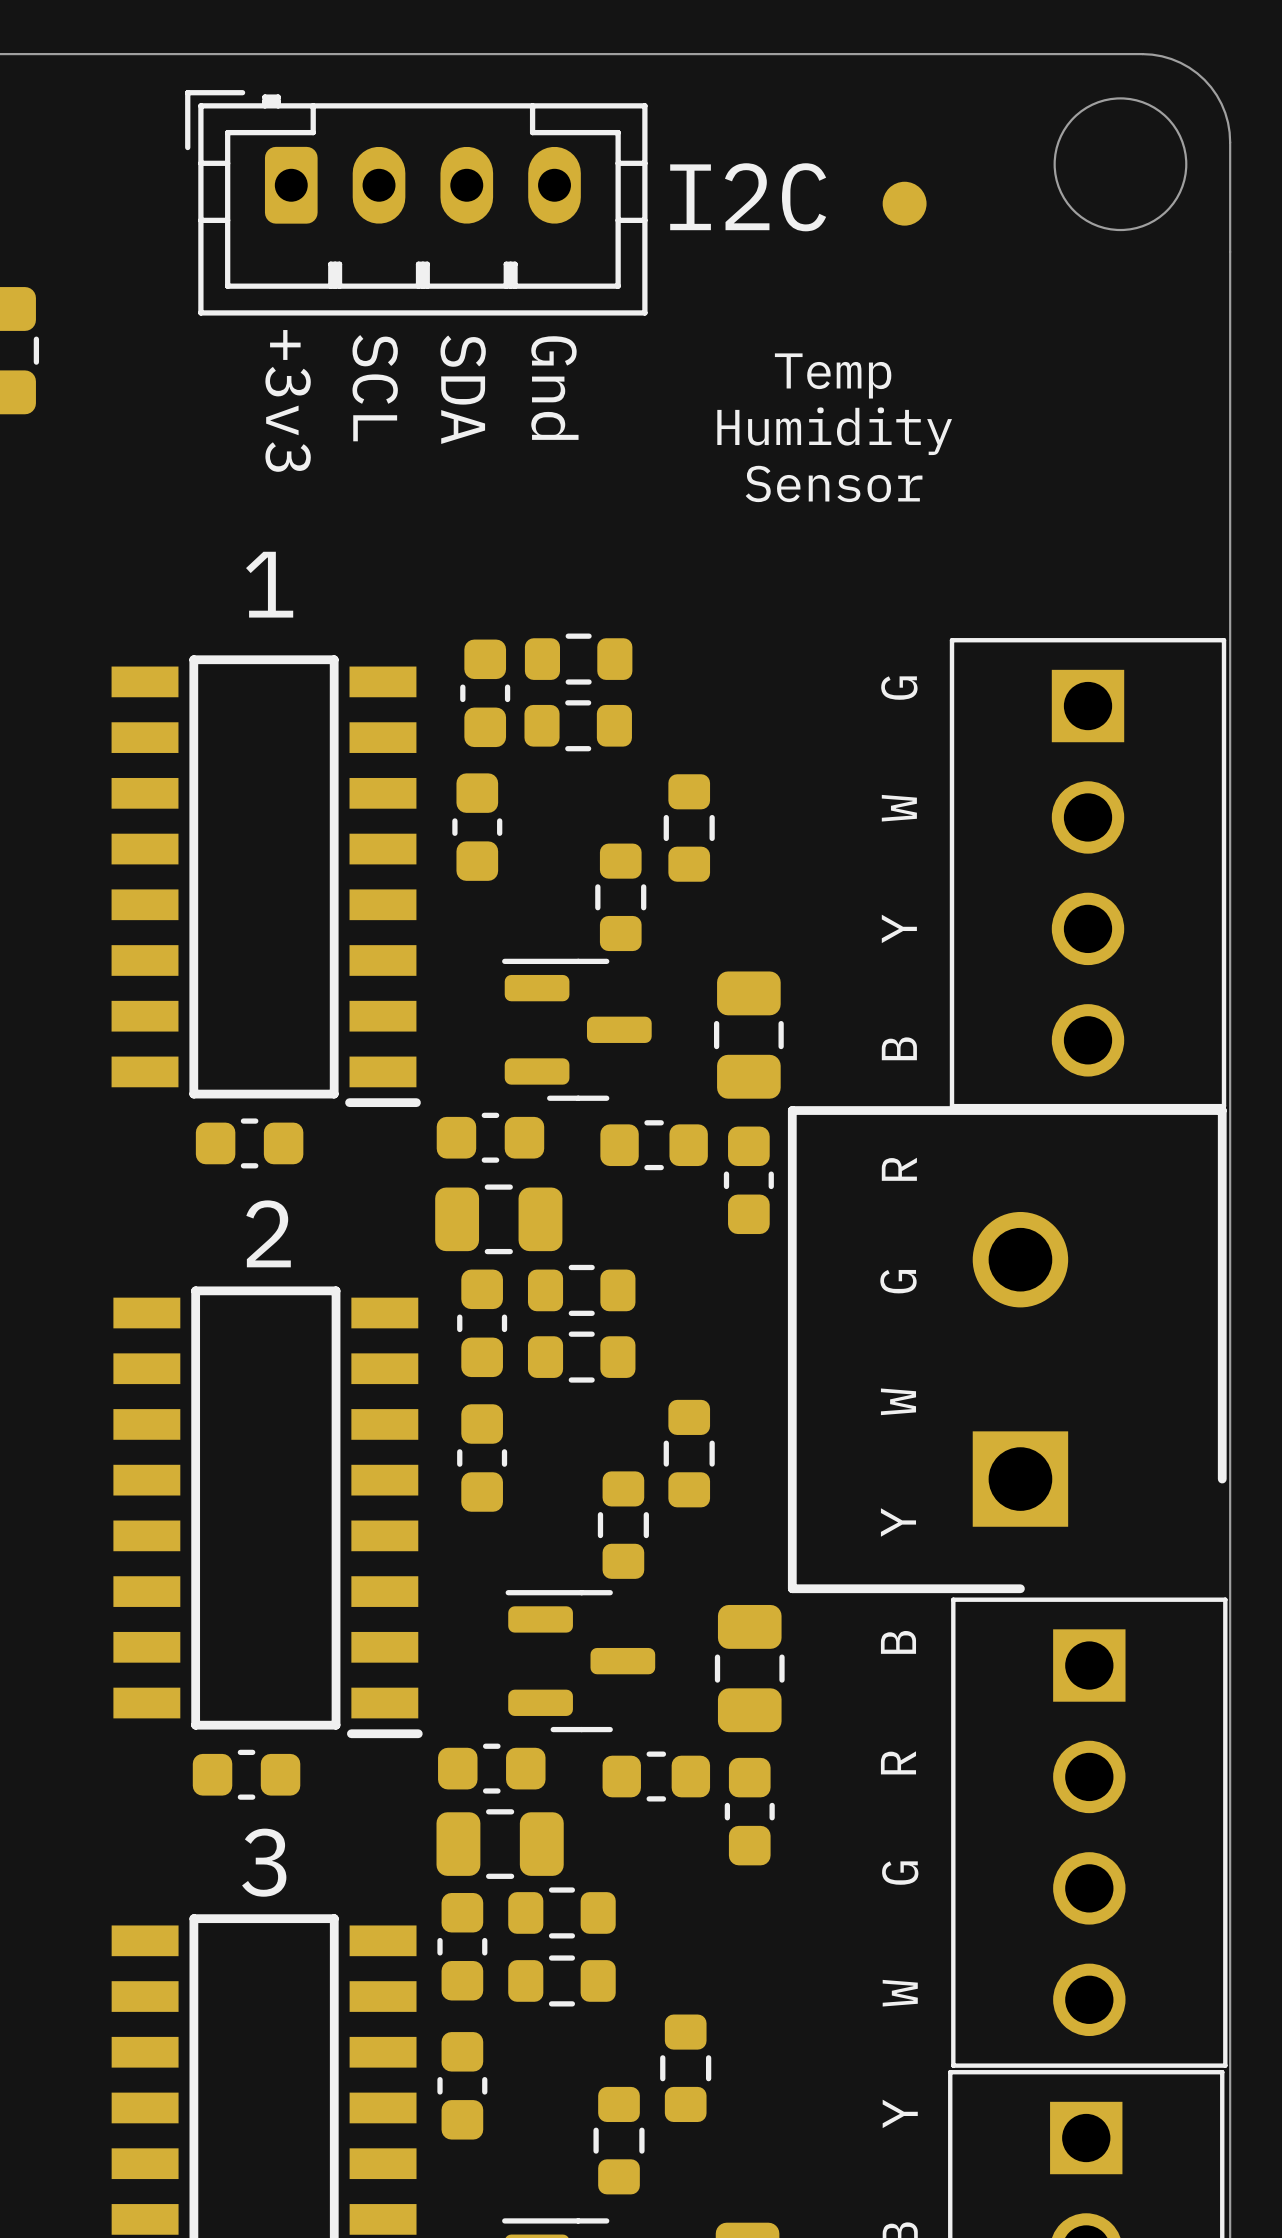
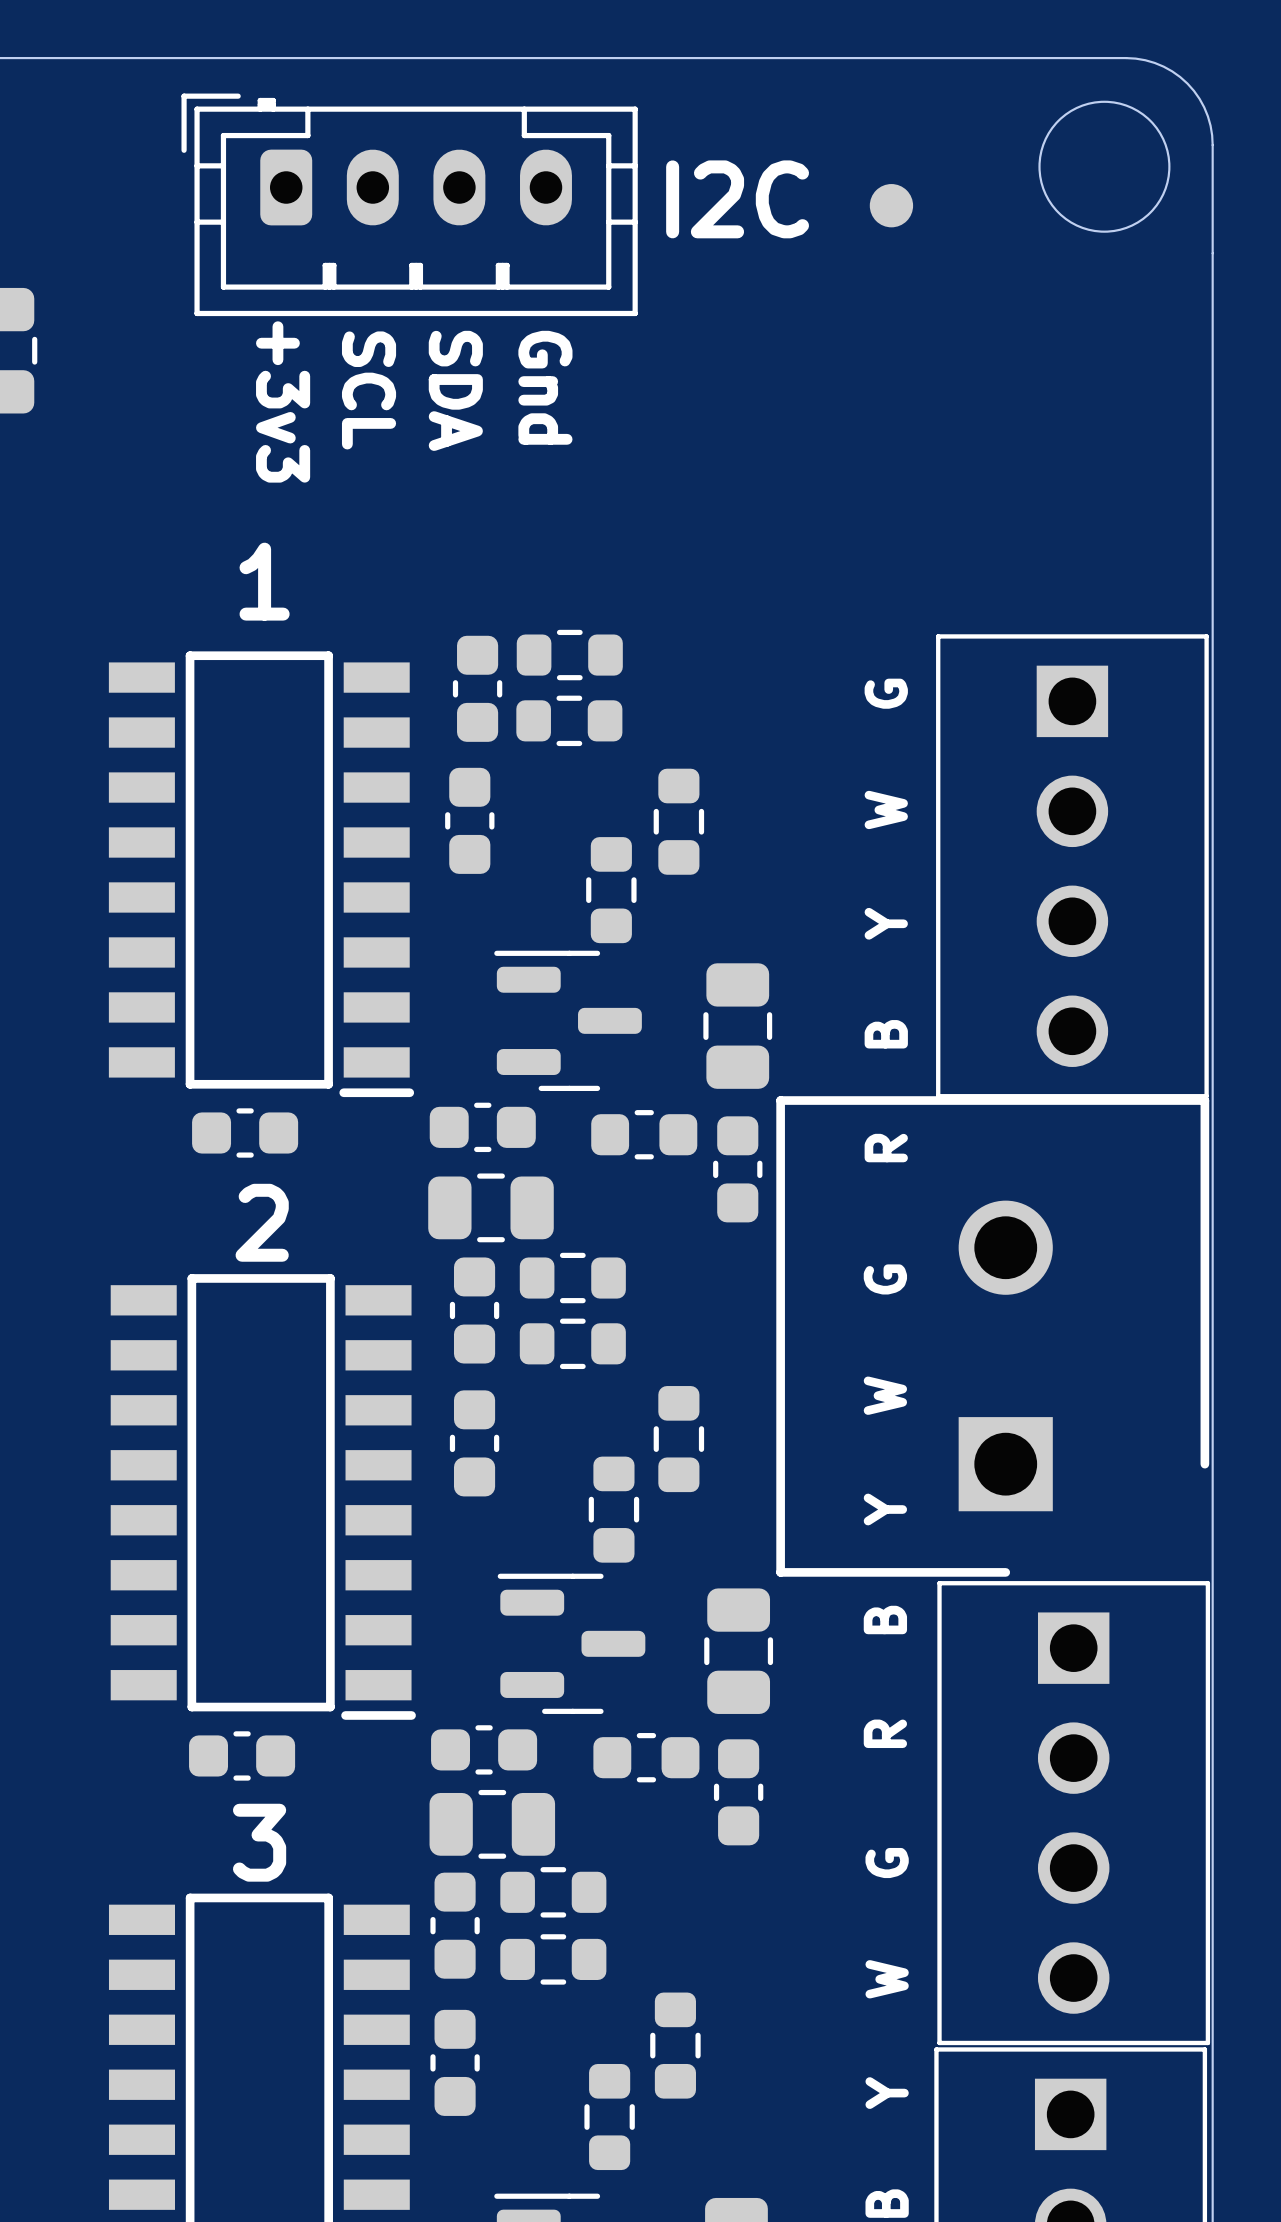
text: Temp (833, 375) -> none
text: Humidity (834, 431) -> none
text: Sensor (834, 483) -> none

